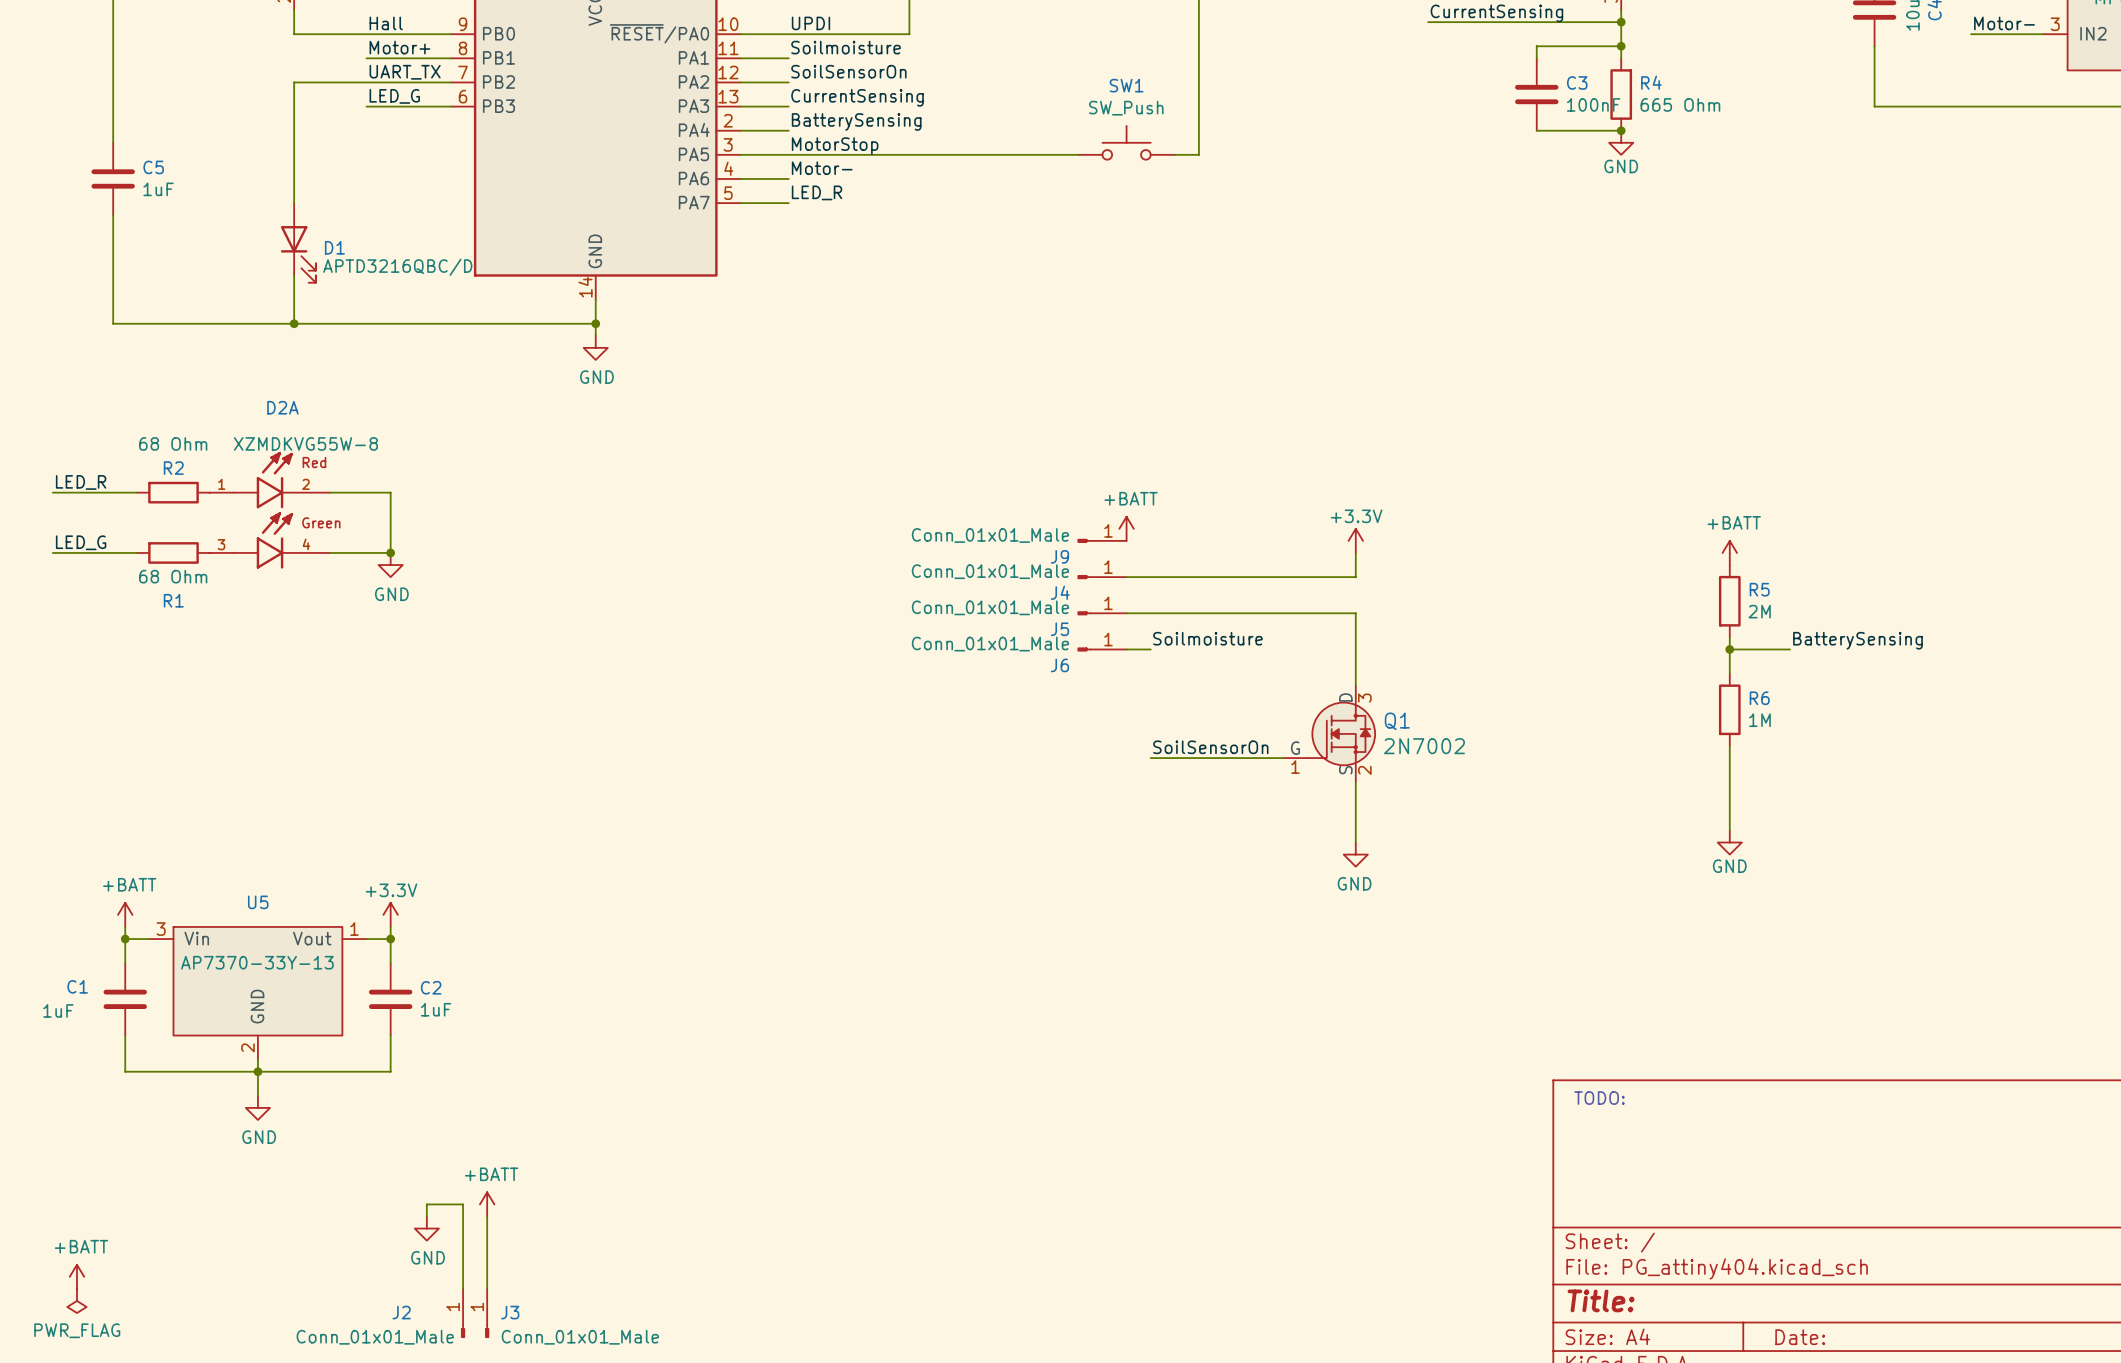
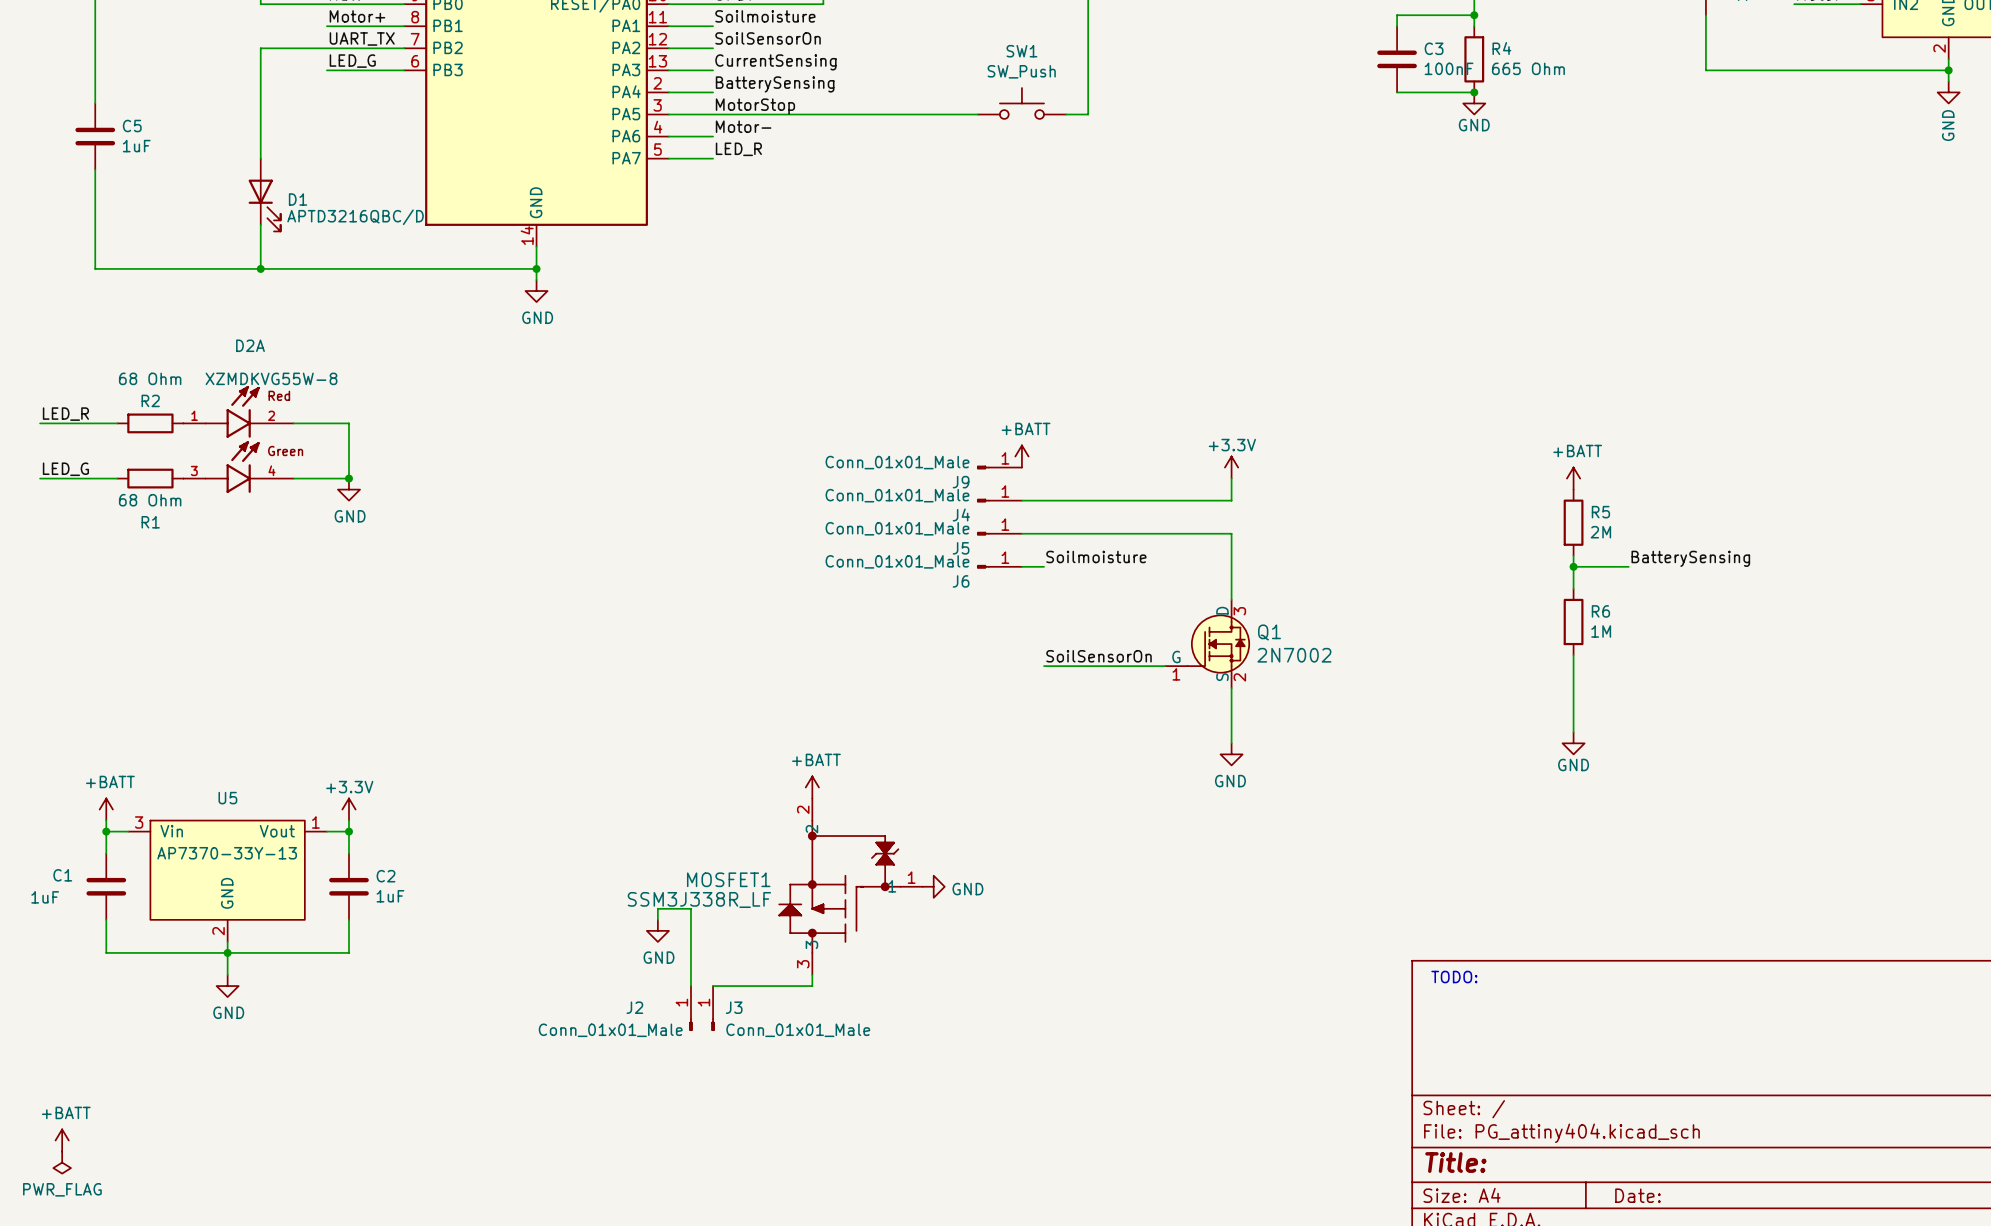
power symbol: none -> +BATT (812, 787)
MOSFET1: none -> SSM3J338R_LF (850, 886)
power symbol: none -> GND (933, 886)
wire: none -> (657, 919) (657, 908) (690, 908) (690, 986)
power symbol: none -> GND (657, 930)
wire: none -> (812, 975) (812, 986) (713, 986)
power symbol: +BATT (487, 1204) -> none
wire: (426, 1216) (426, 1204) (463, 1204) (463, 1288) -> none
wire: (487, 1216) (487, 1288) -> none
power symbol: GND (426, 1228) -> none
J2 position: (463, 1313) -> (690, 1008)
J3 position: (487, 1313) -> (713, 1008)

